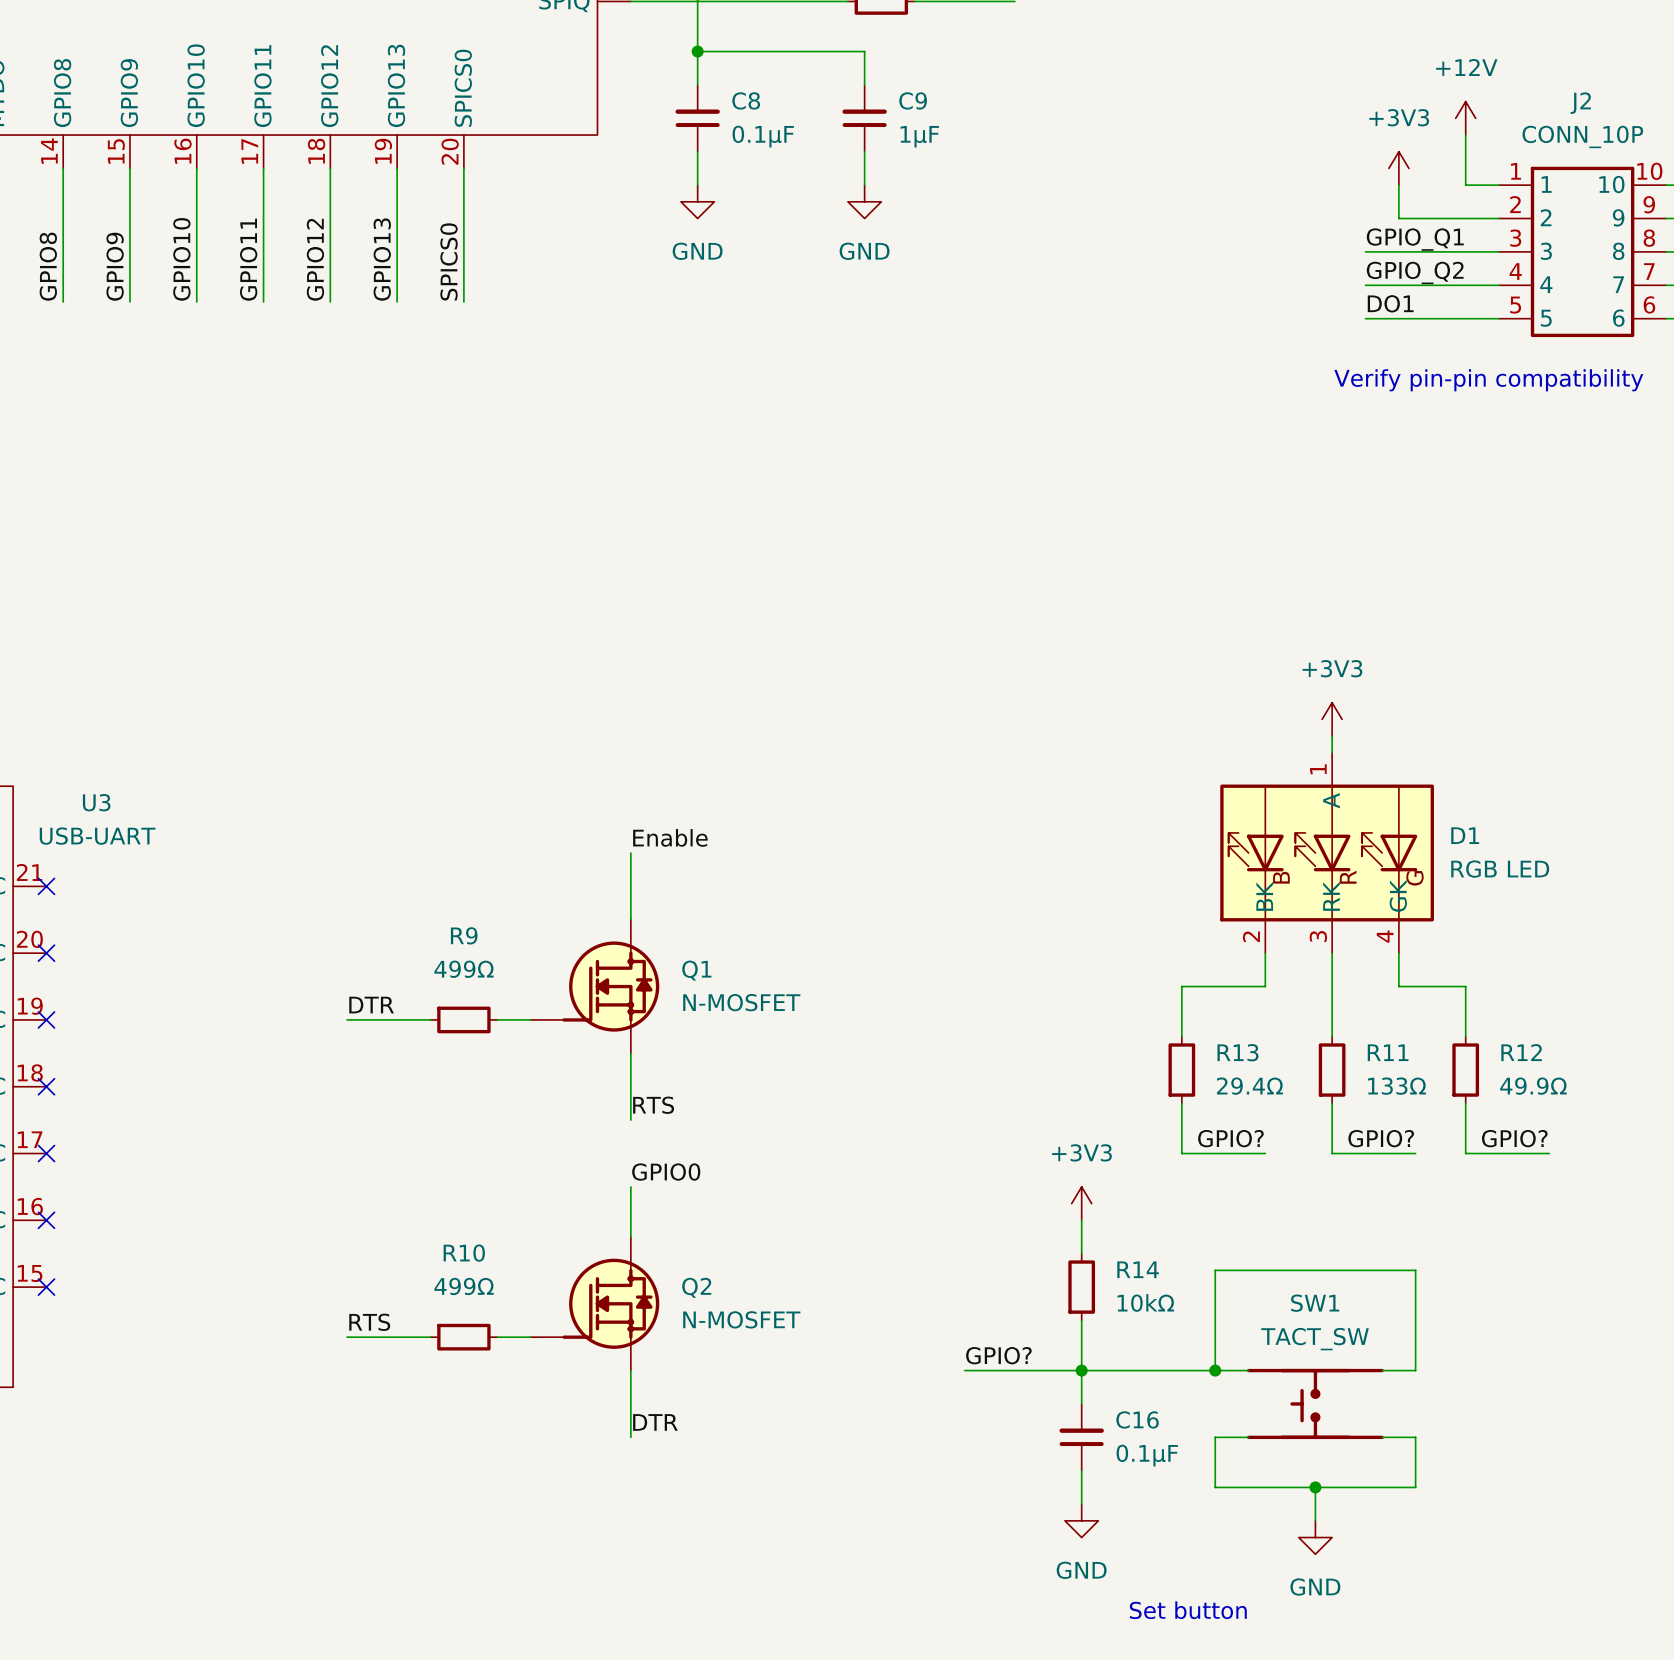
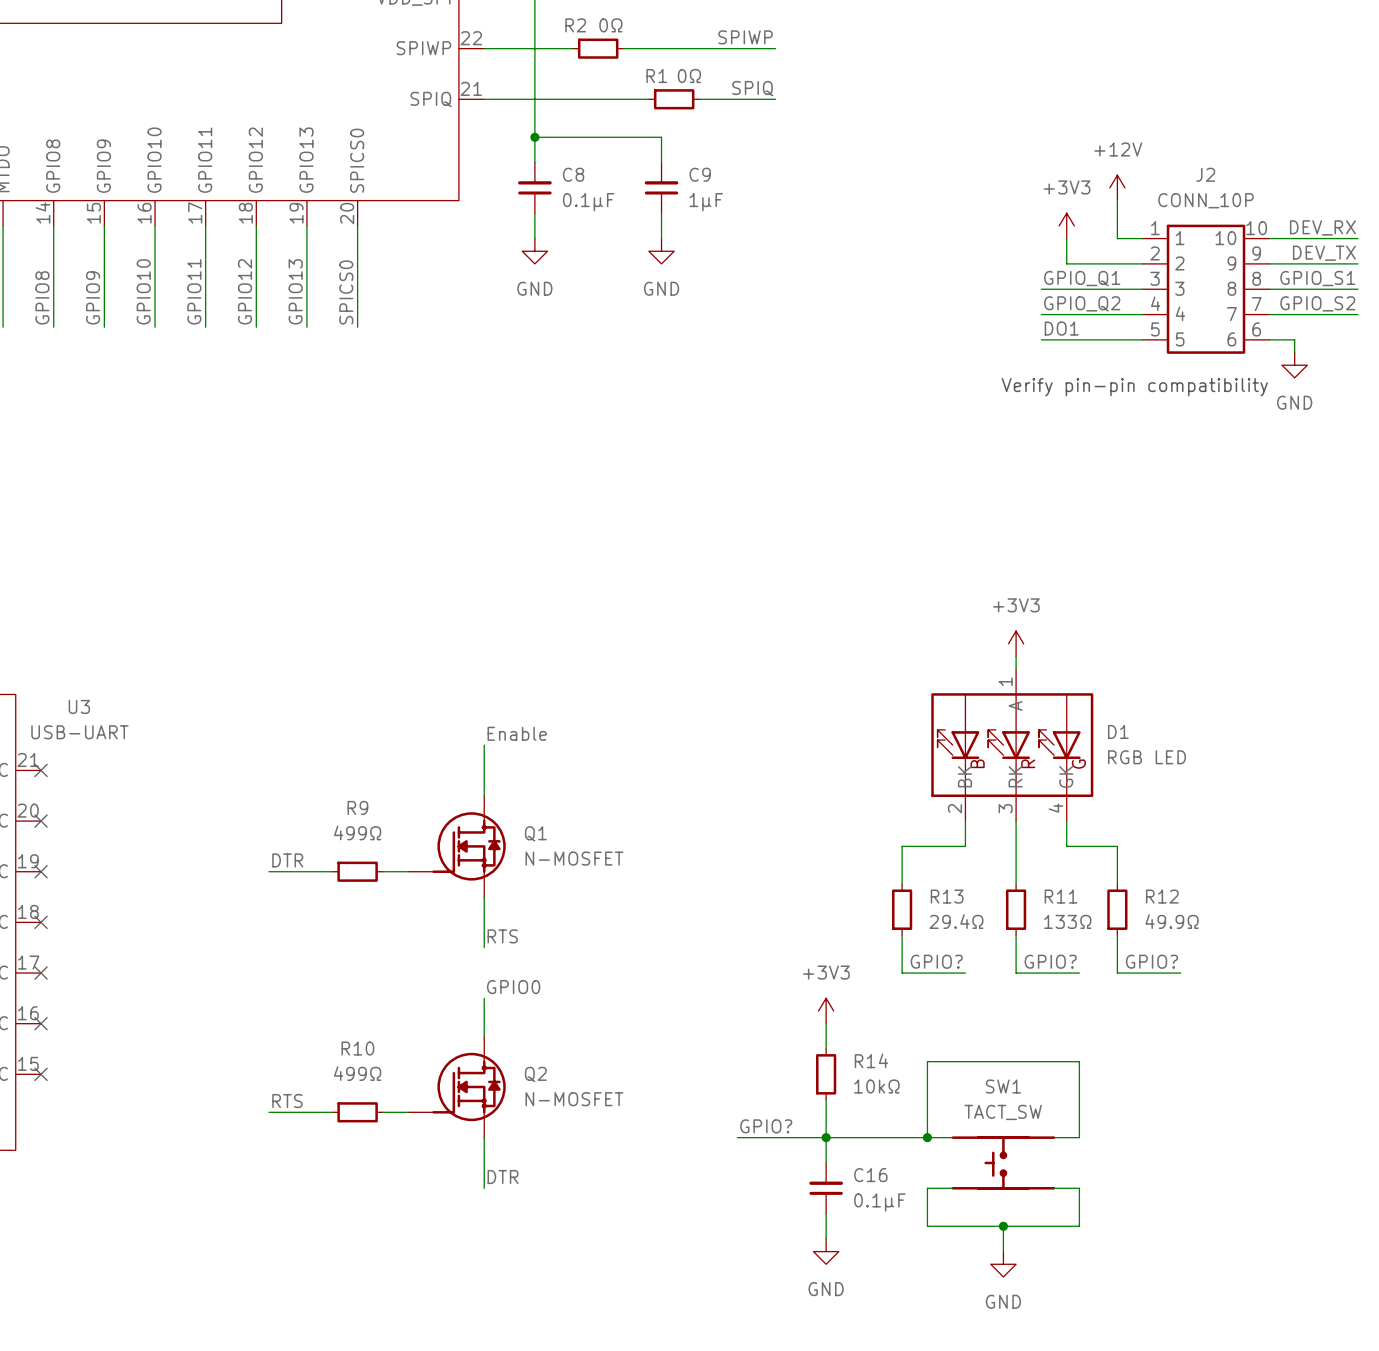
text: Set button (1188, 1610) -> none

